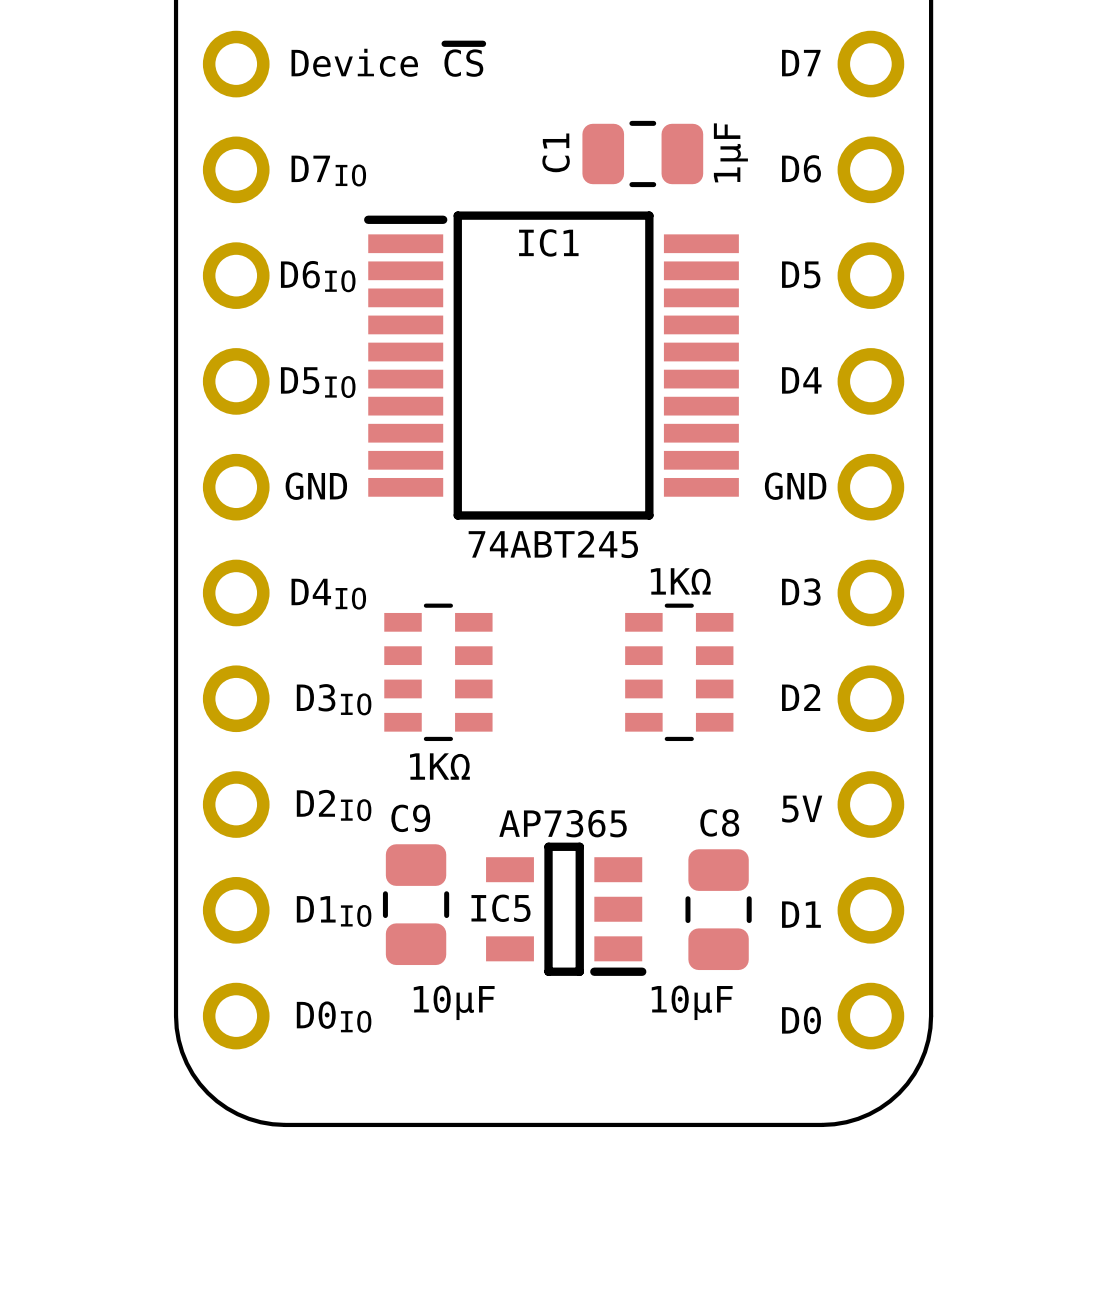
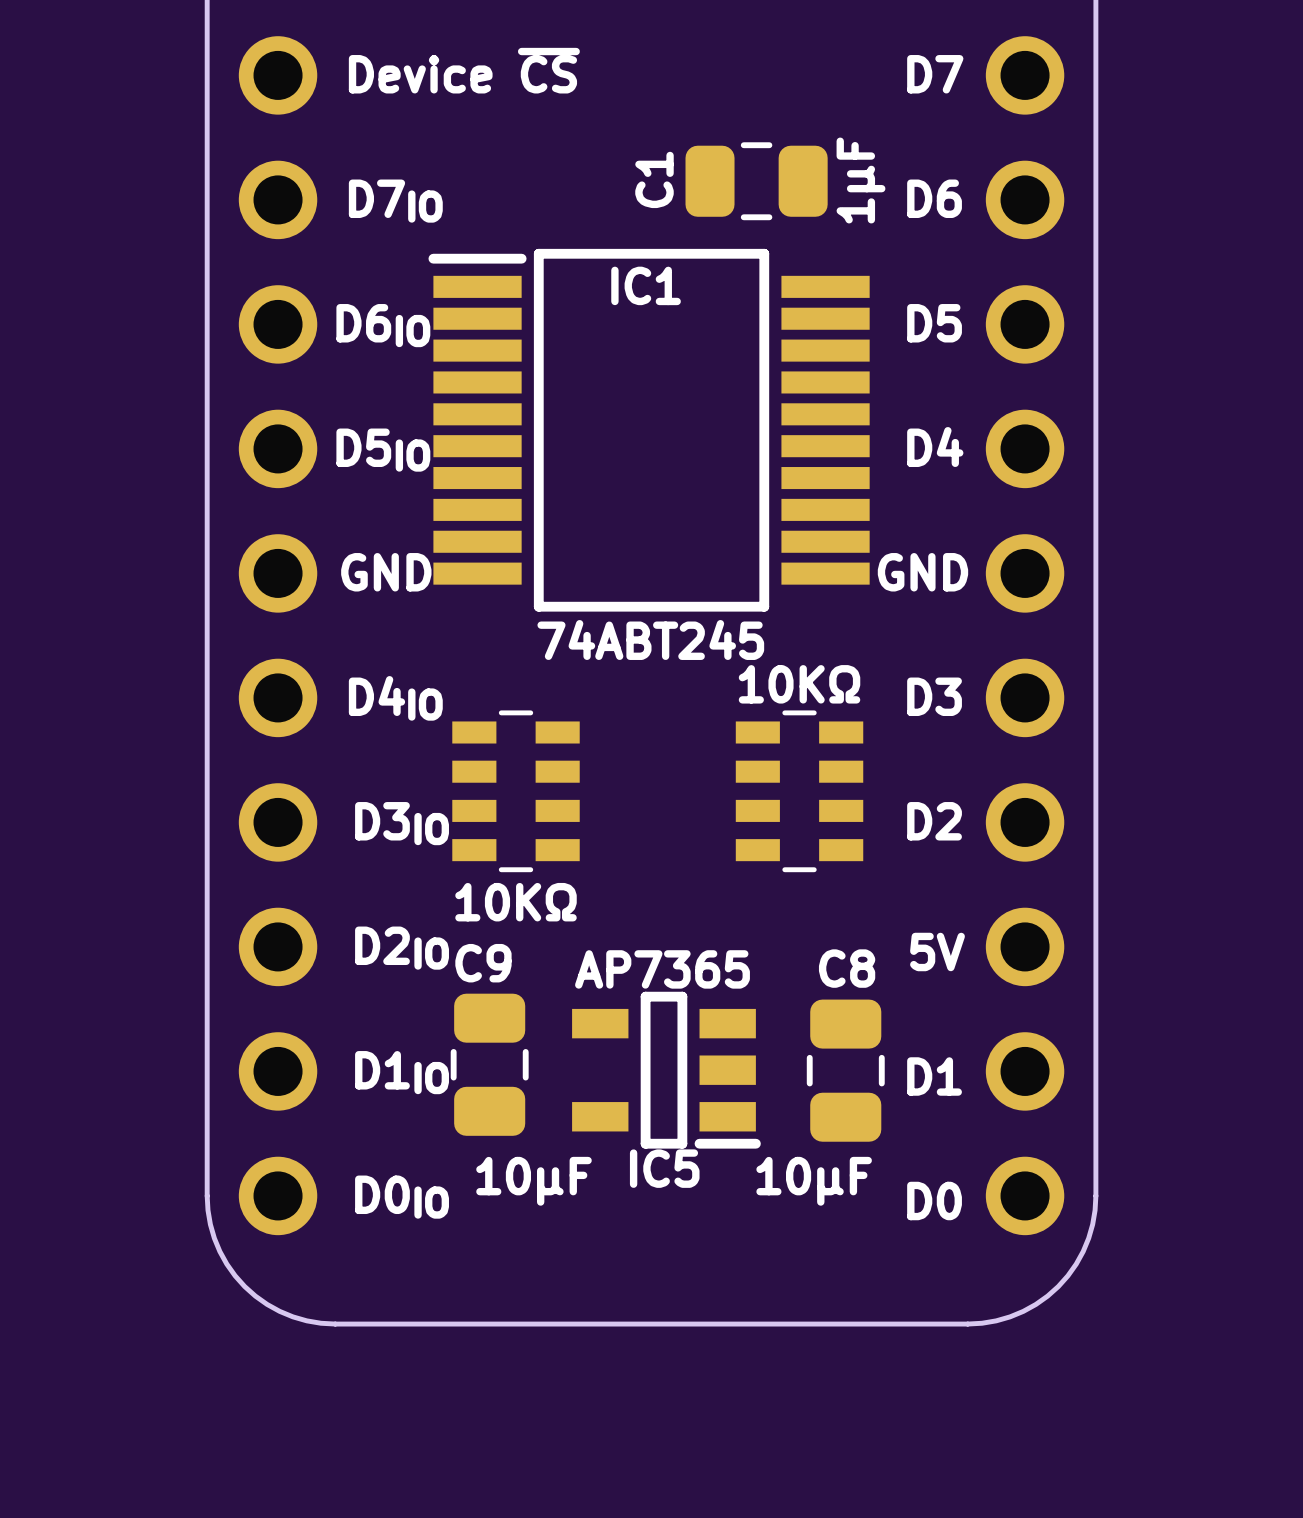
part text: 1KΩ (680, 581) -> 10KΩ (799, 684)
part text: 1KΩ (439, 766) -> 10KΩ (516, 902)
IC5 name position: IC5 (501, 908) -> IC5 (664, 1168)

